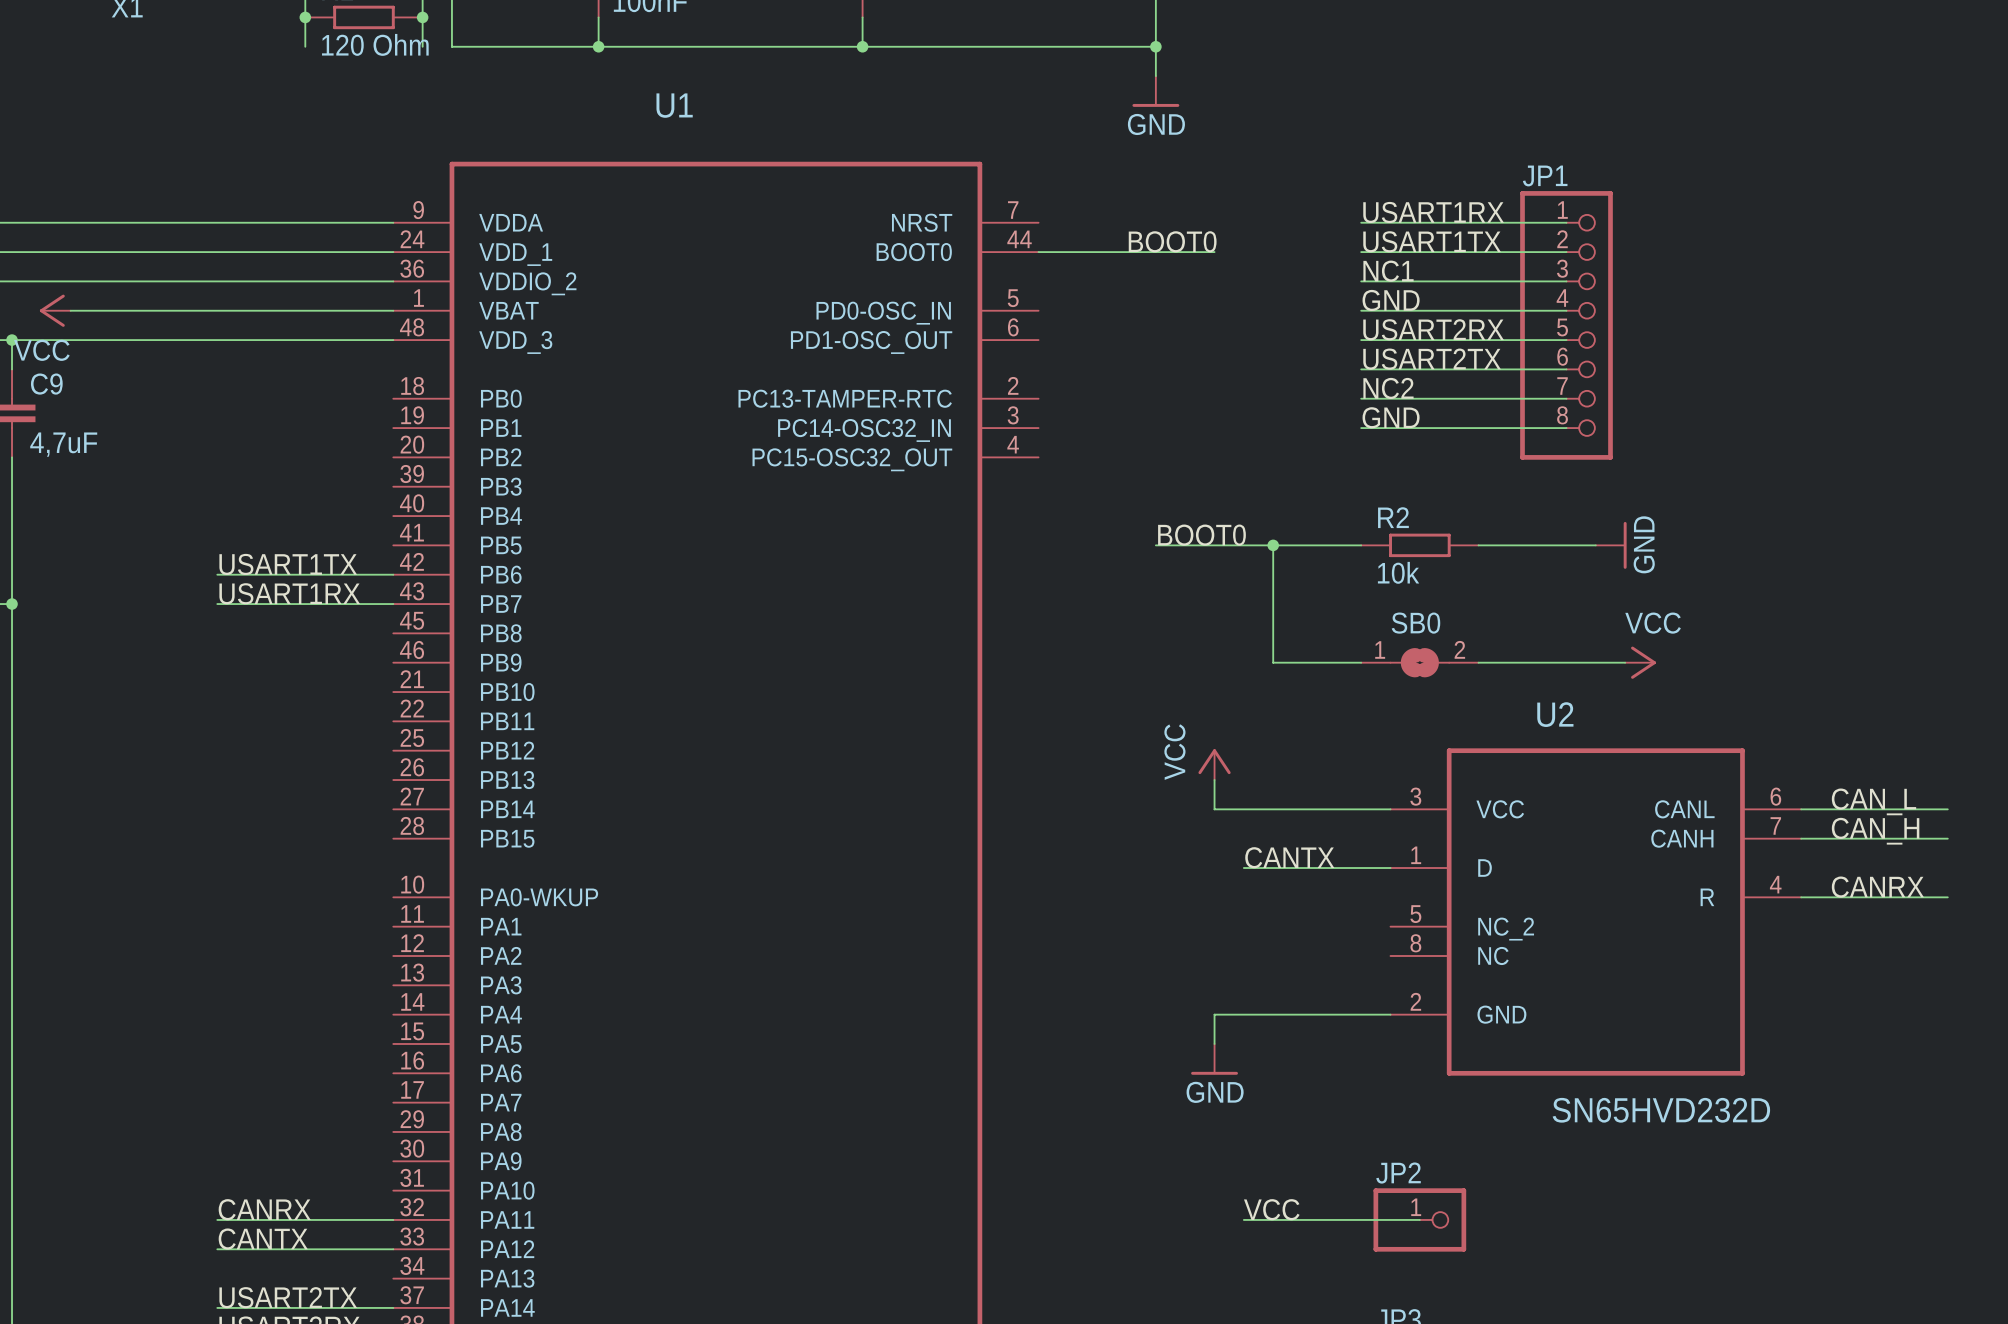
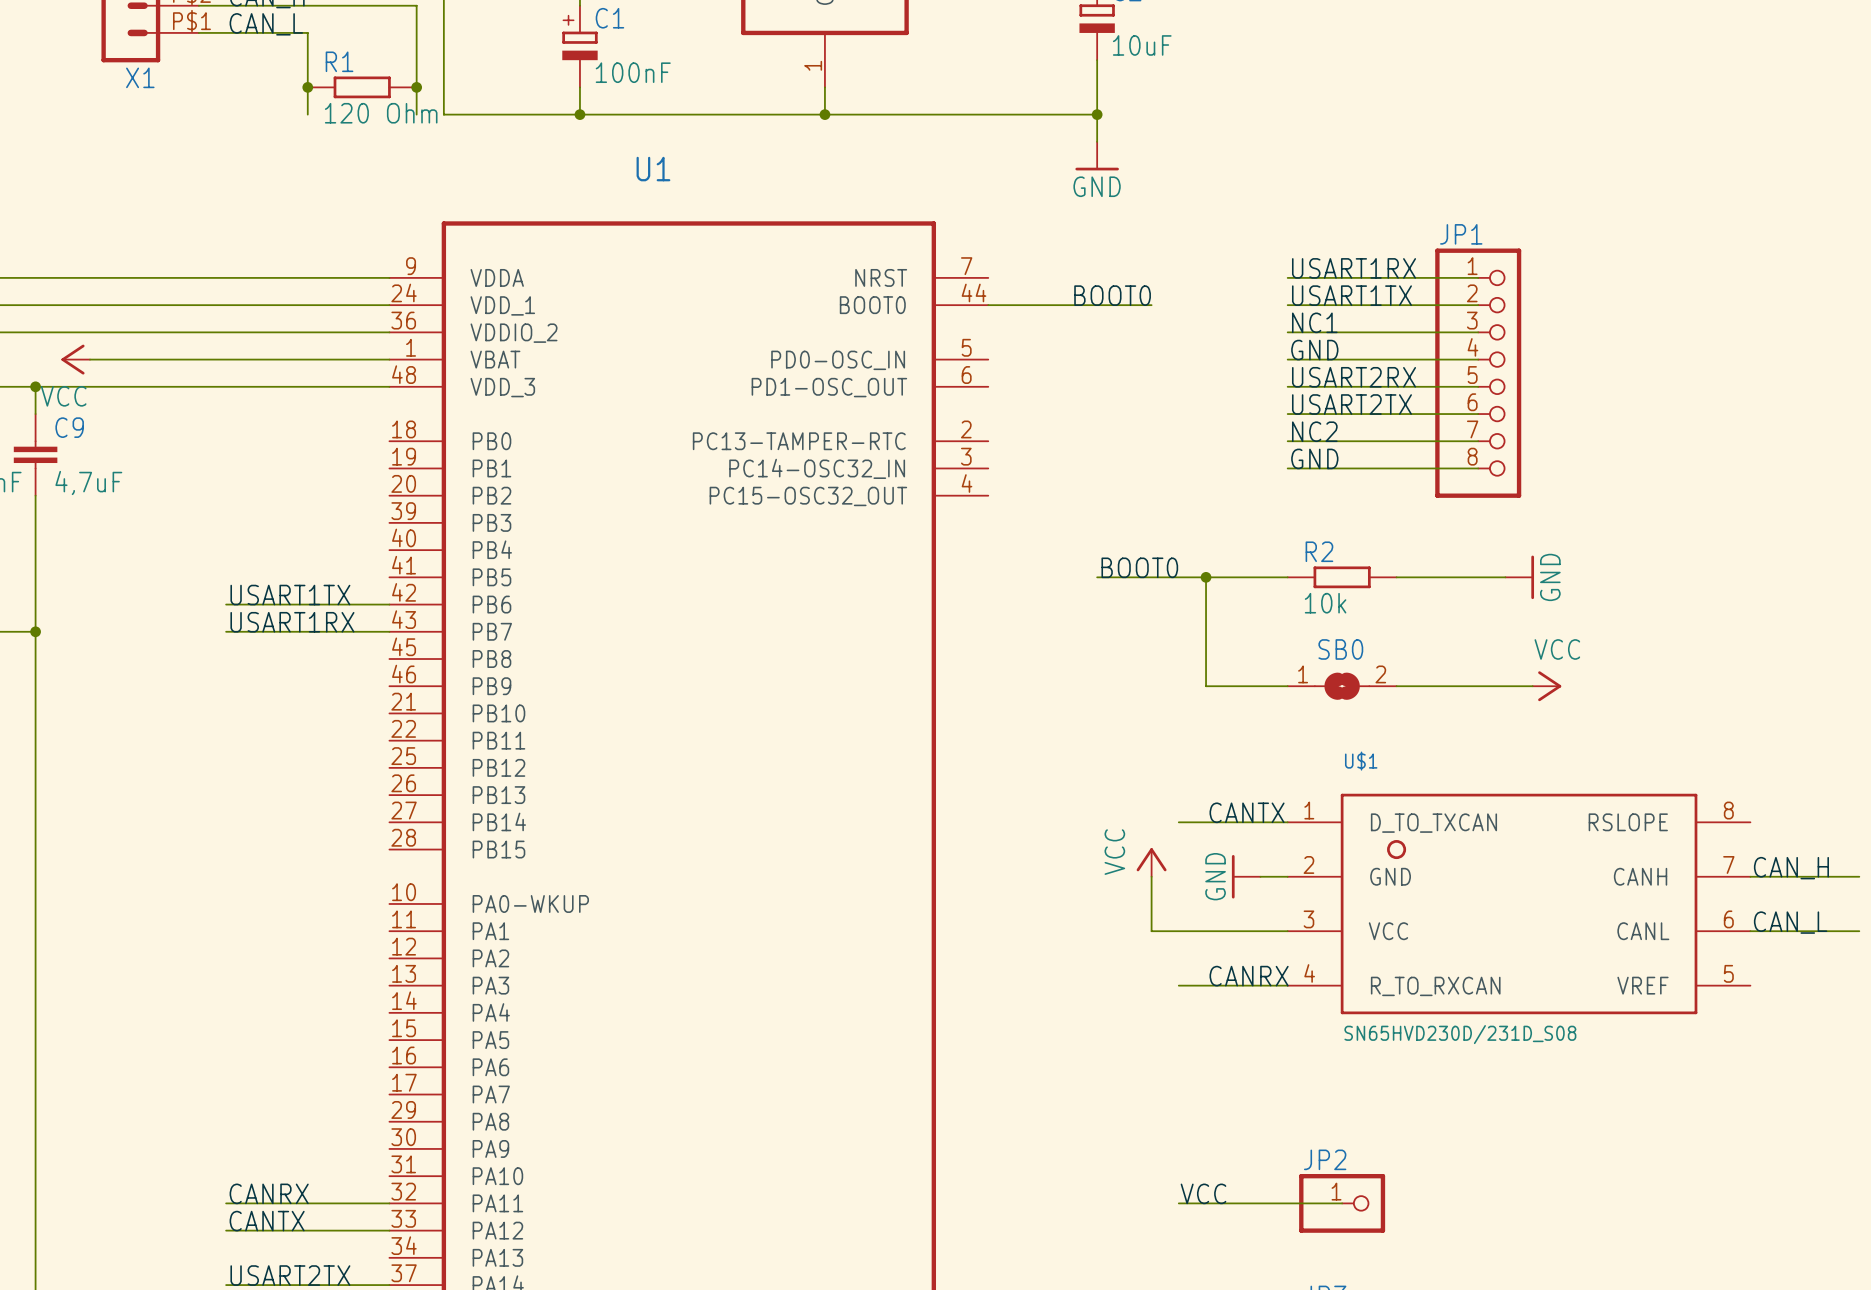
power symbol position: VCC (1214, 764) -> VCC (1151, 862)
wire: (1214, 780) (1214, 809) (1243, 809) -> none
label position: CAN_L (1874, 801) -> CAN_L (1790, 922)
wire: (1801, 809) (1947, 809) -> none
label position: CAN_H (1875, 831) -> CAN_H (1791, 868)
wire: (1801, 838) (1947, 838) -> none
label position: CANTX (1289, 857) -> CANTX (1247, 812)
wire: none -> (1151, 876) (1151, 931) (1287, 931)
wire: (1243, 868) (1331, 868) -> none
wire: none -> (1750, 876) (1859, 876)
label: CANRX (1877, 887) -> none
U$1: none -> SN65HVD230D/231D_S08 (1519, 903)
wire: (1801, 897) (1947, 897) -> none
U2: SN65HVD232D (1595, 912) -> none
wire: none -> (1750, 931) (1859, 931)
label: none -> CANRX (1249, 976)
wire: none -> (1178, 985) (1287, 985)
wire: (1390, 1014) (1214, 1014) (1214, 1043) -> none
power symbol position: GND (1214, 1059) -> GND (1246, 876)
power symbol rotation: 0° (1214, 1073) -> 90° clockwise (1233, 876)

